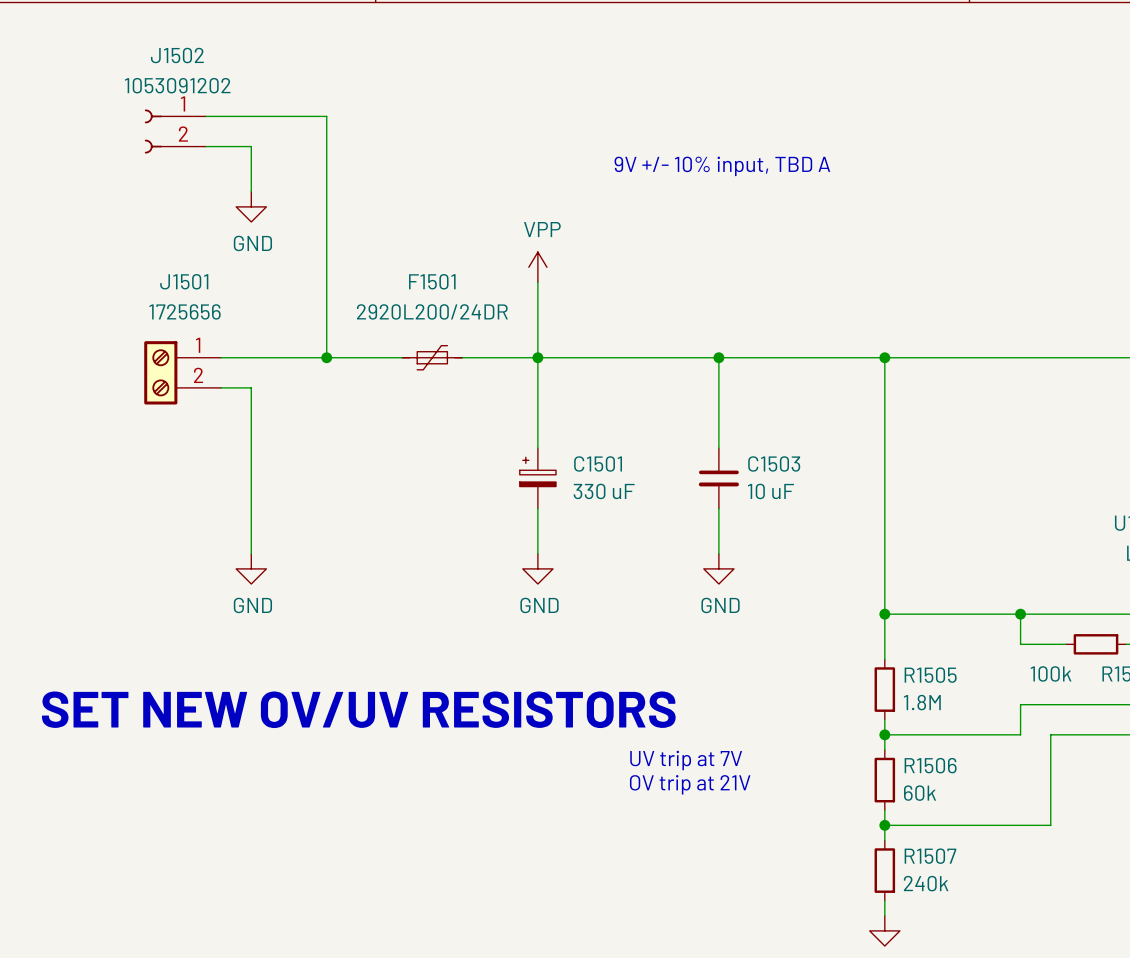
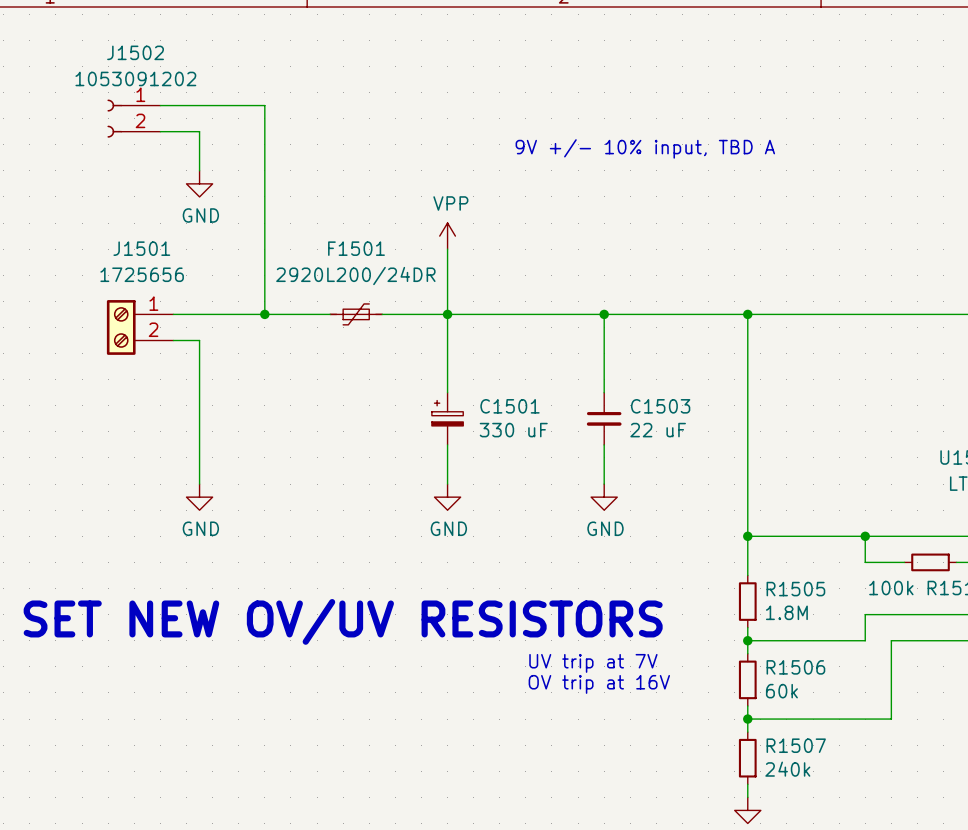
C1503 value: 10 uF (770, 491) -> 22 uF (658, 430)
text: OV trip at 21V (690, 784) -> OV trip at 16V (599, 684)

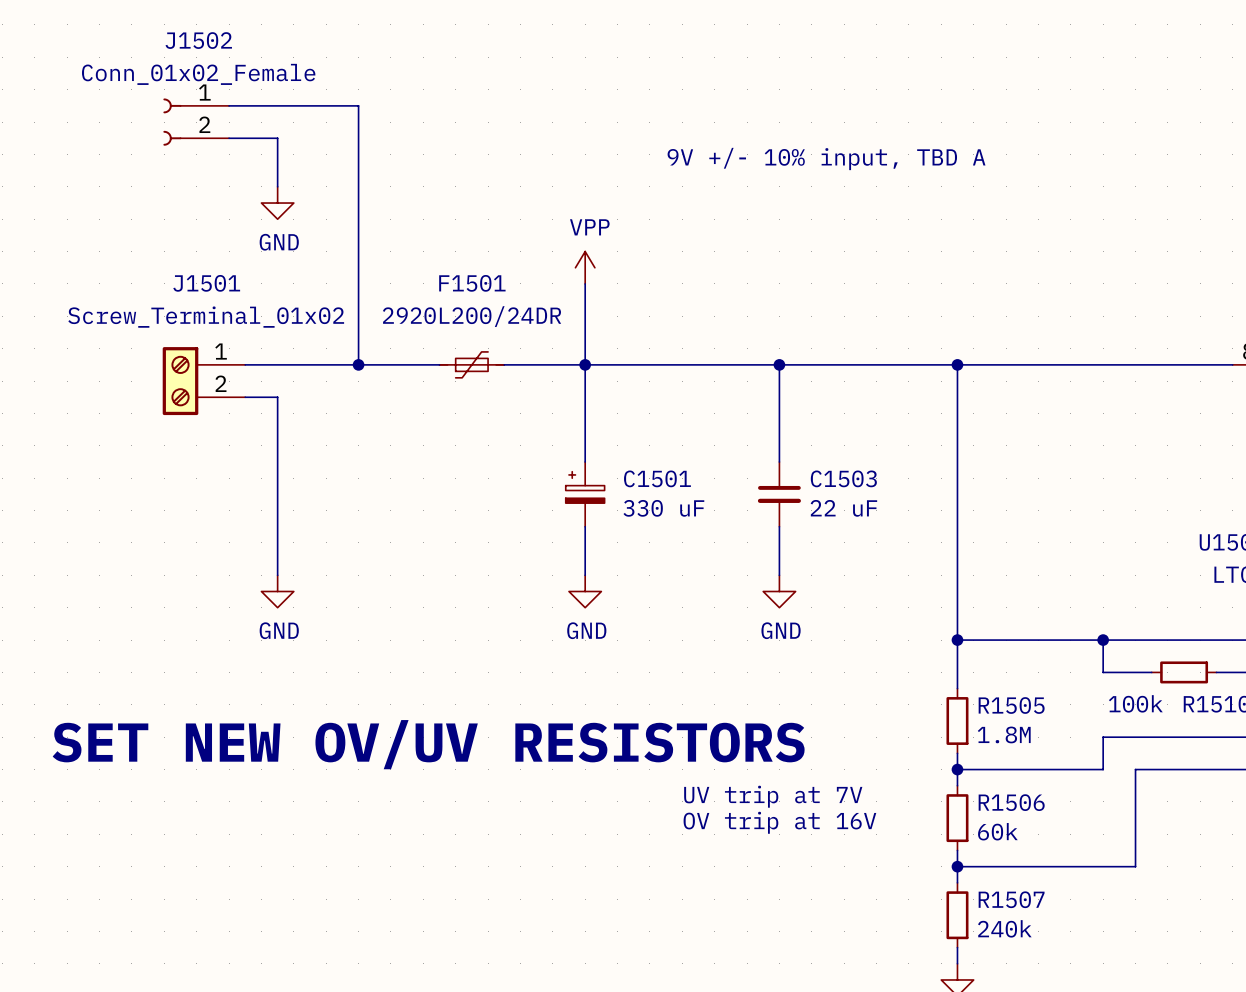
J1502 value: 1053091202 (135, 78) -> Conn_01x02_Female (198, 74)
J1501 value: 1725656 (142, 274) -> Screw_Terminal_01x02 (206, 317)

